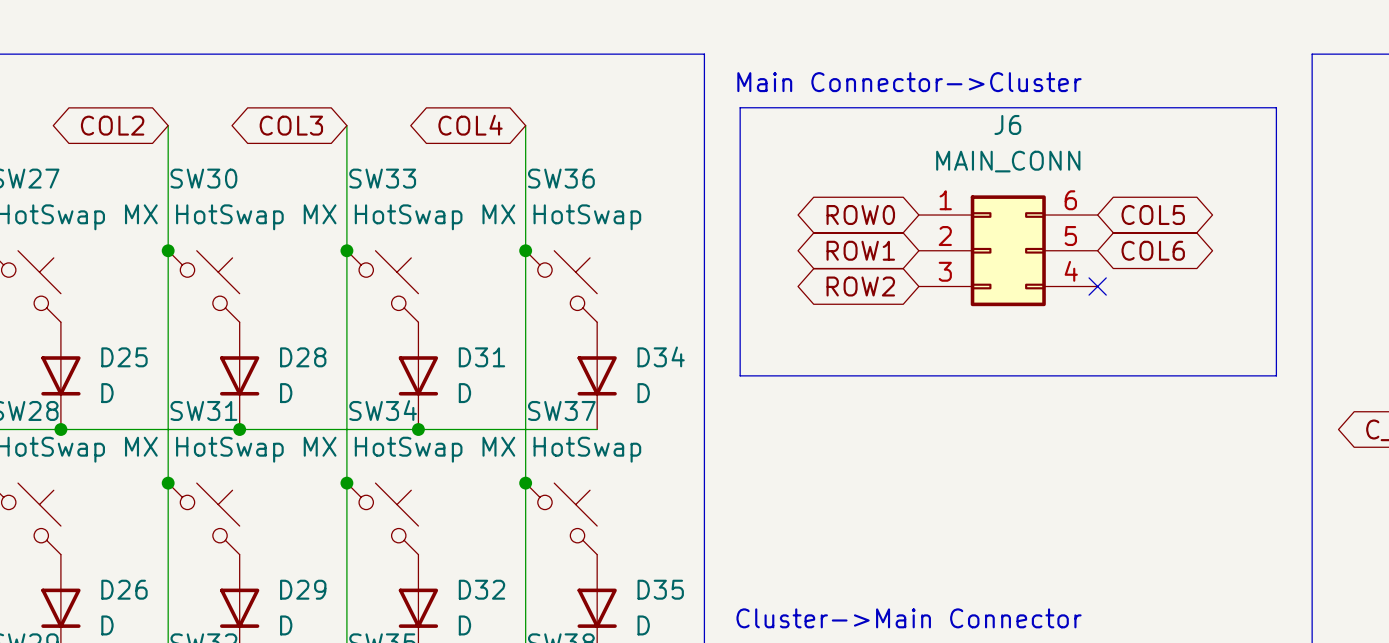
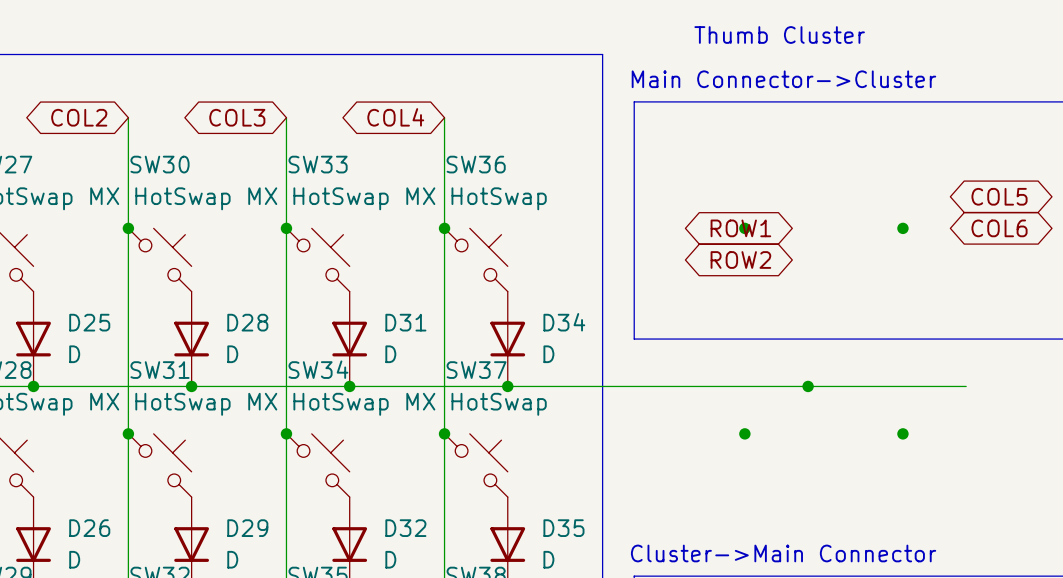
text: none -> Thumb Cluster (779, 34)
global label: ROW0 (860, 215) -> none
junction: none -> (744, 228)
J6: MAIN_CONN (1008, 250) -> none
junction: none -> (902, 228)
no-connect mark: (1097, 286) -> none
wire: none -> (507, 386) (966, 386)
junction: none -> (507, 386)
junction: none -> (808, 386)
junction: none -> (744, 433)
junction: none -> (902, 433)

